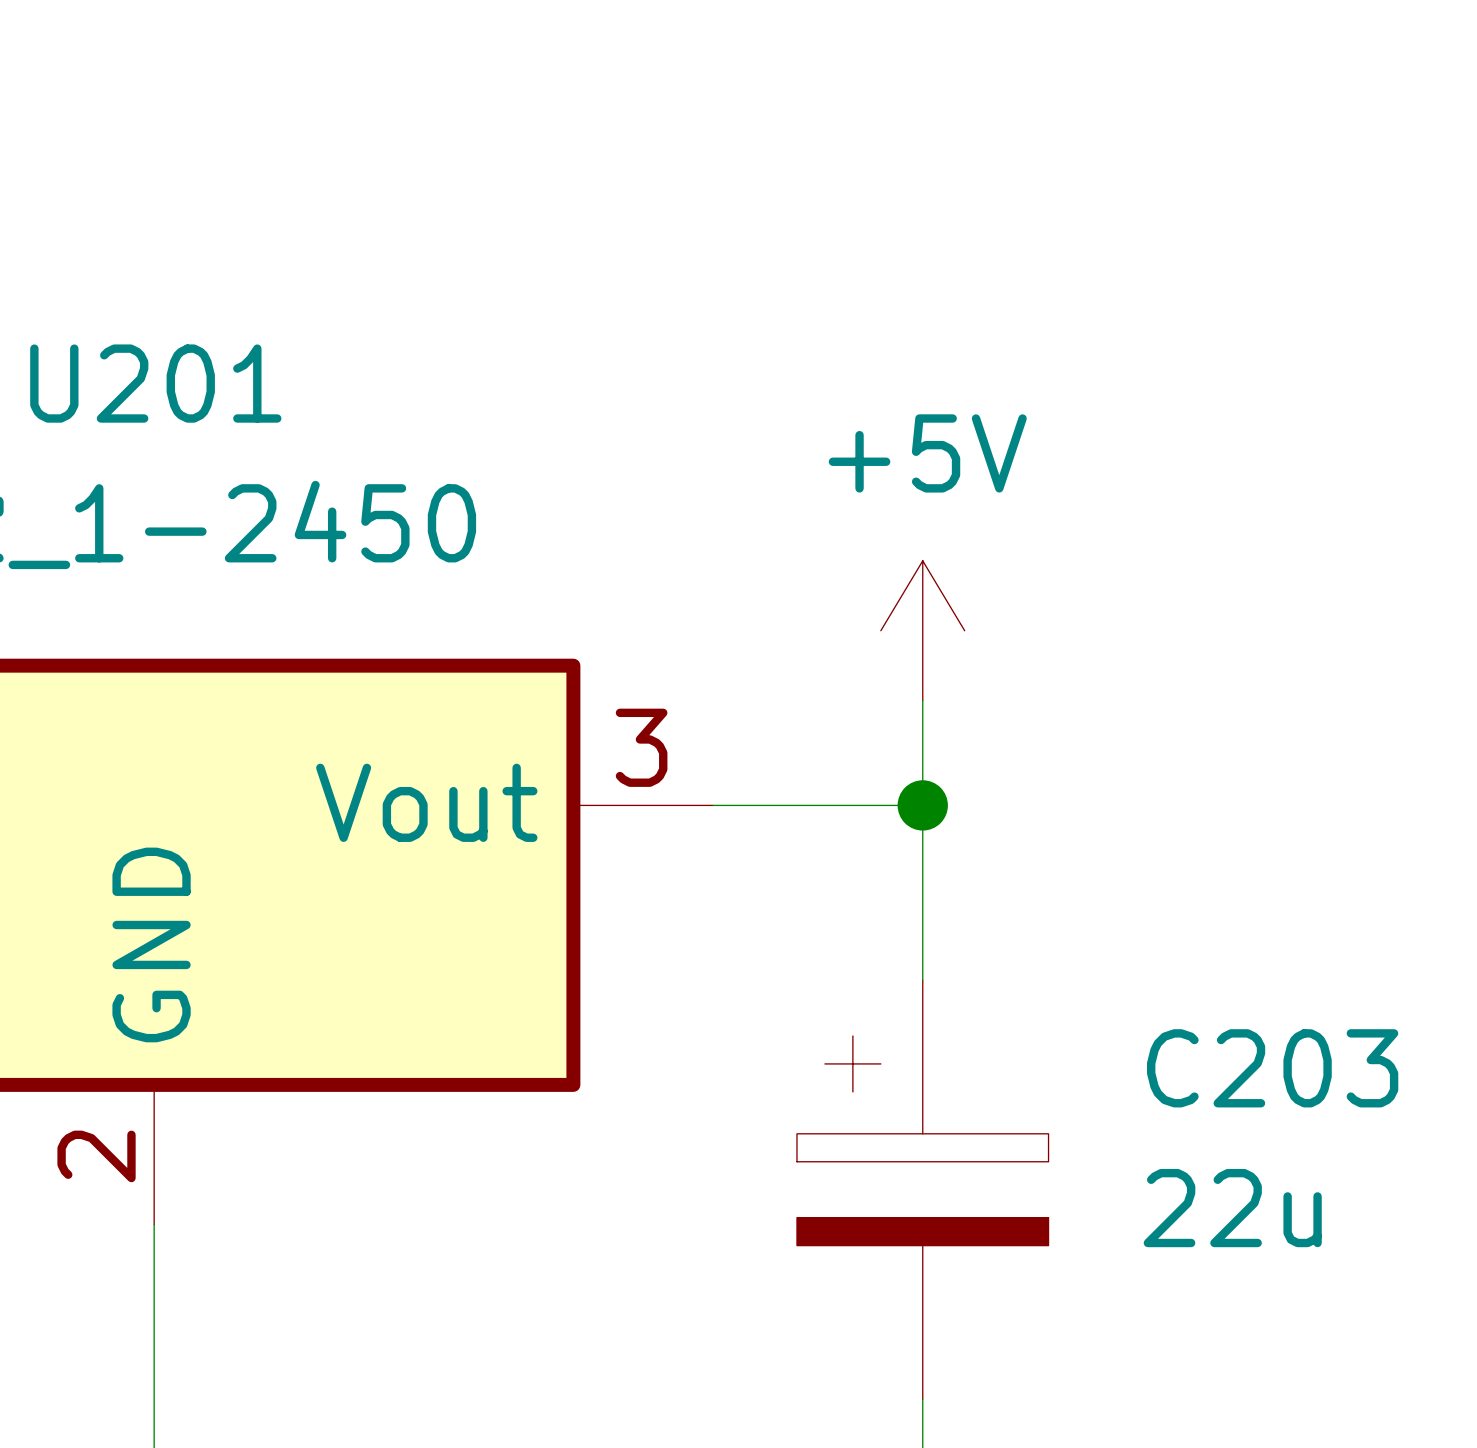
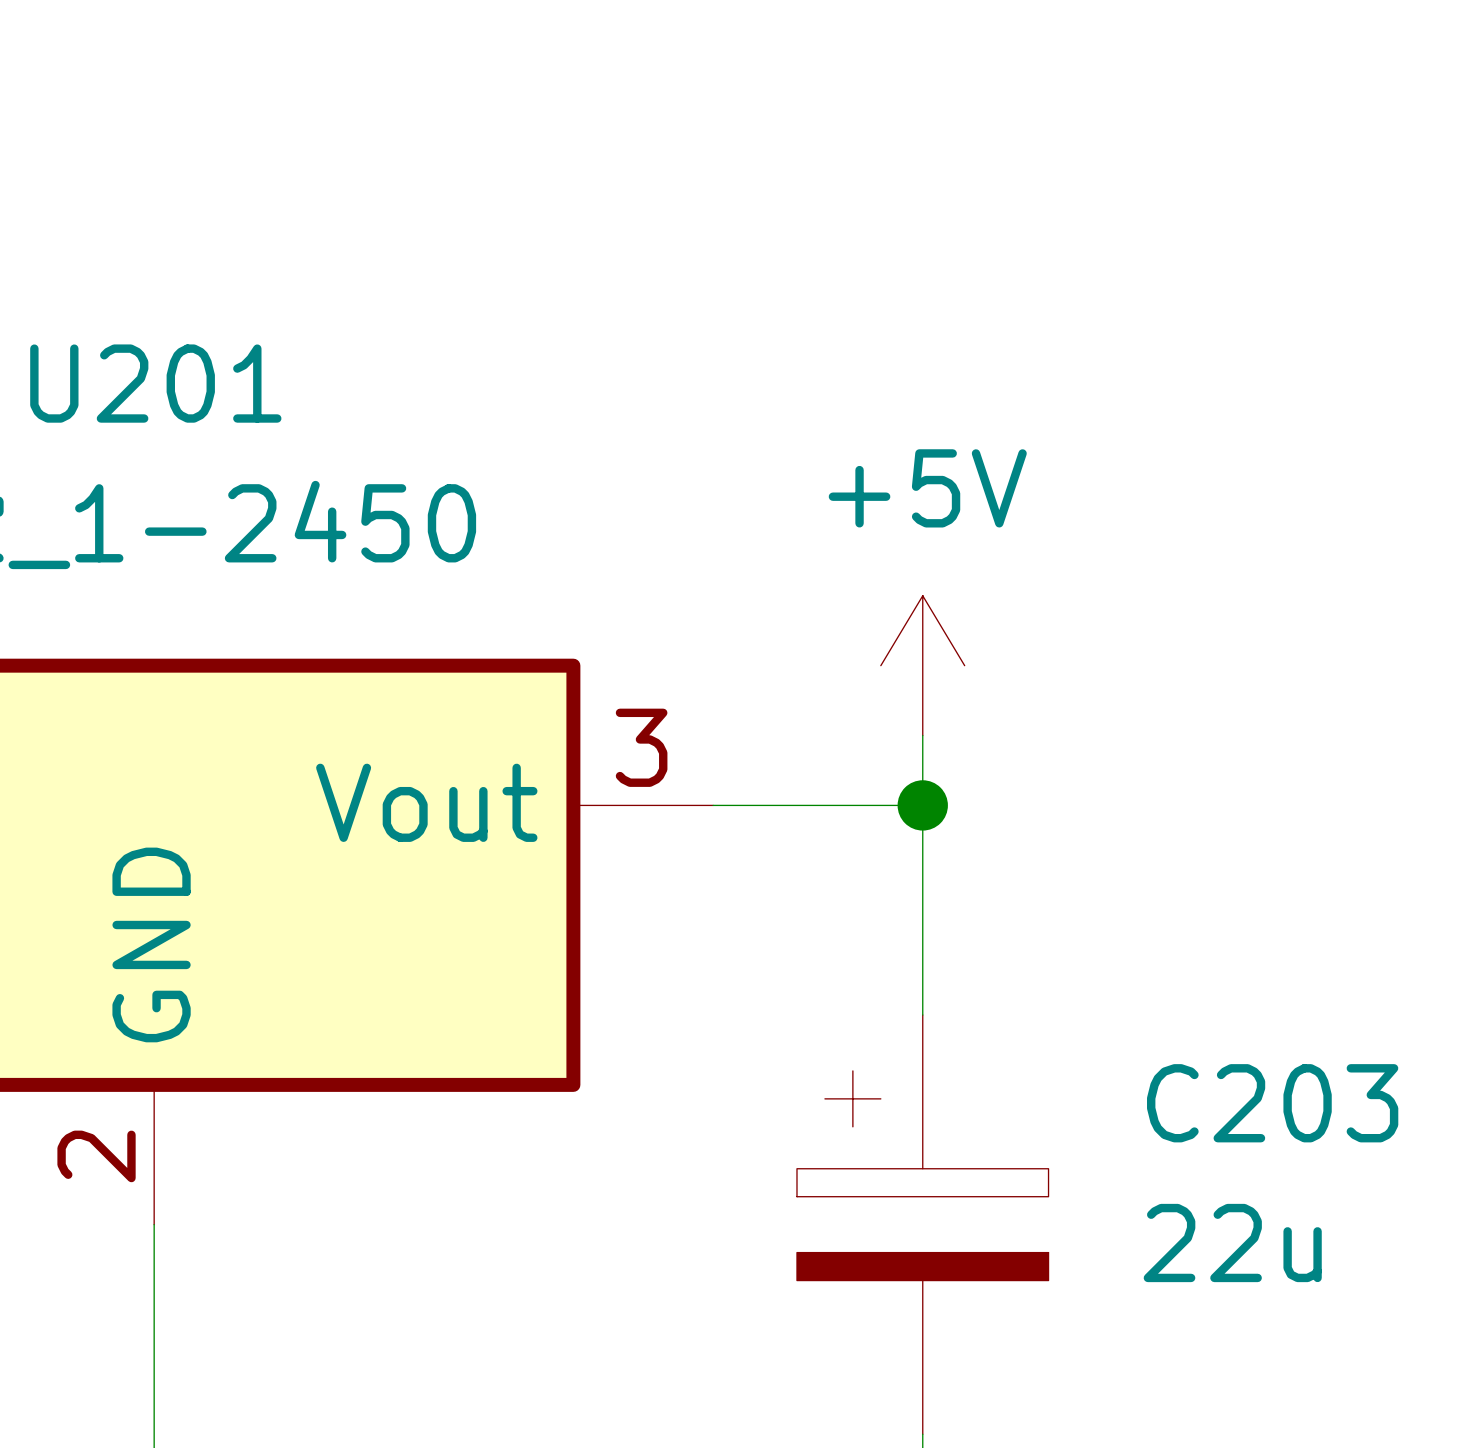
power symbol position: +5V (922, 630) -> +5V (922, 665)
C203 position: (922, 1189) -> (922, 1224)

